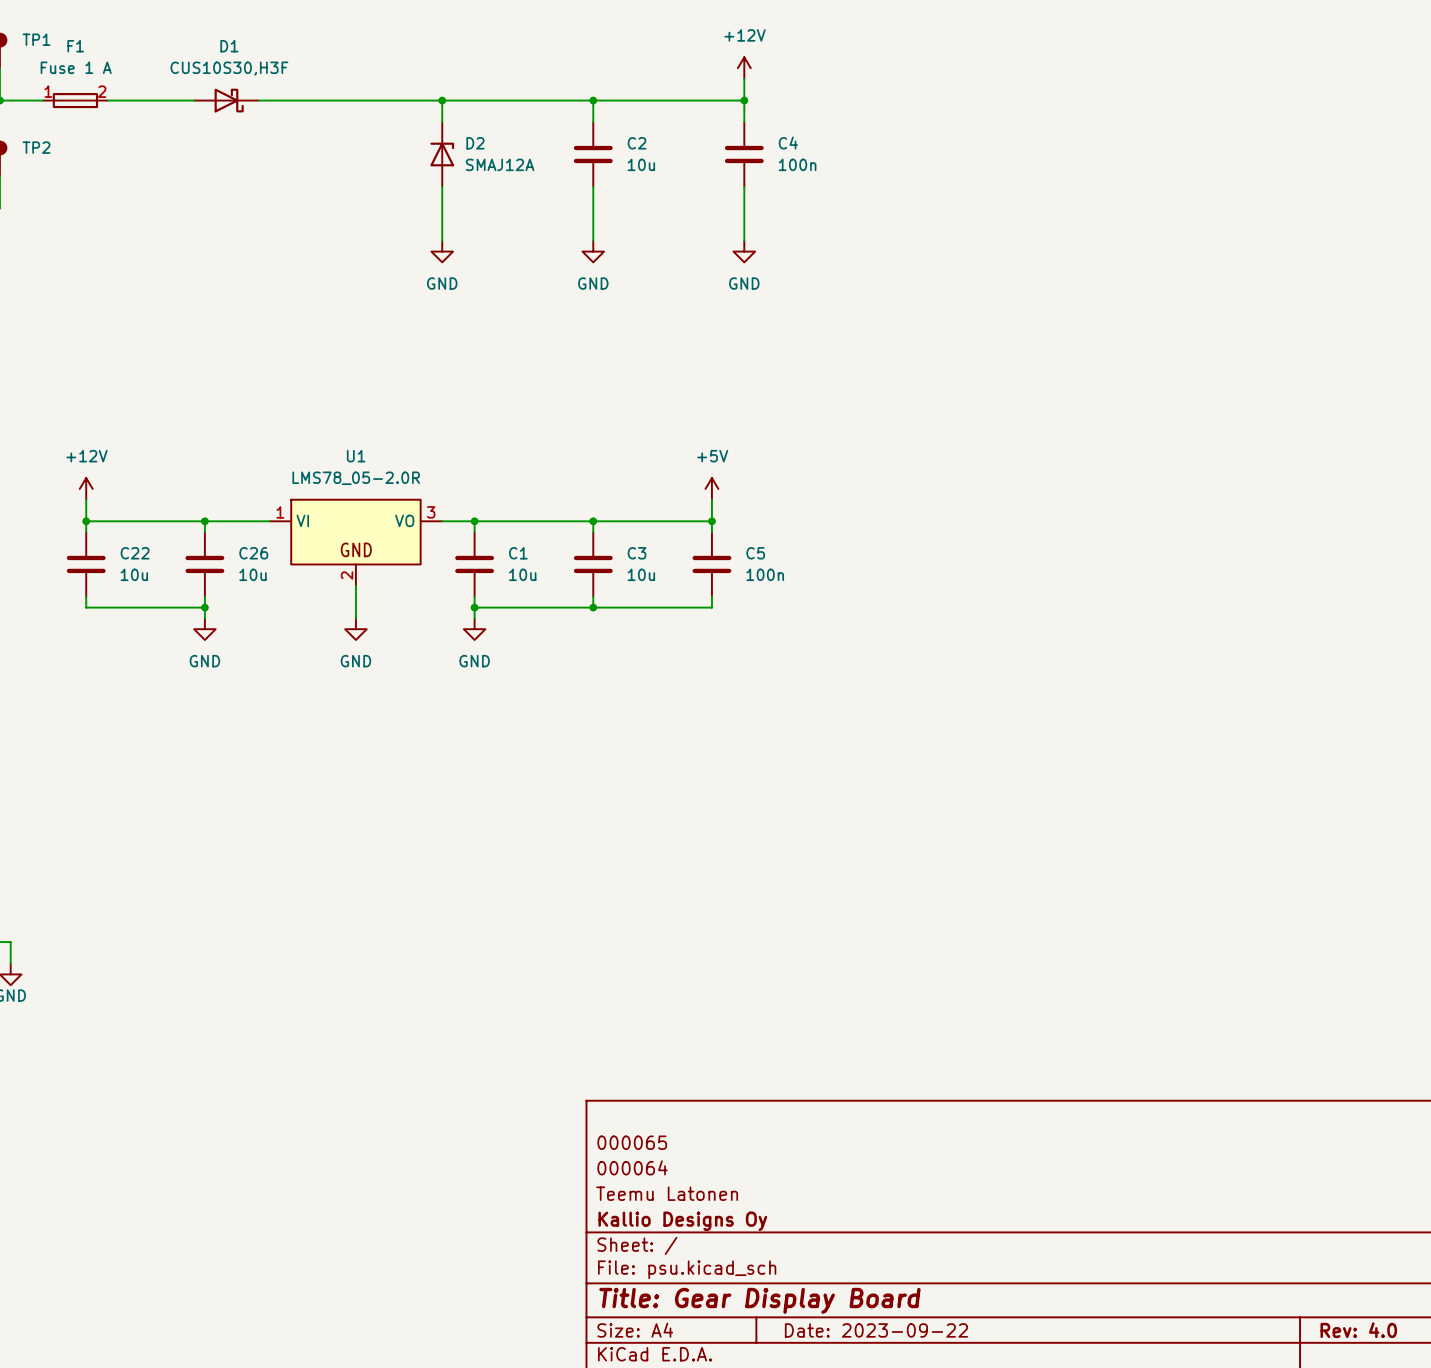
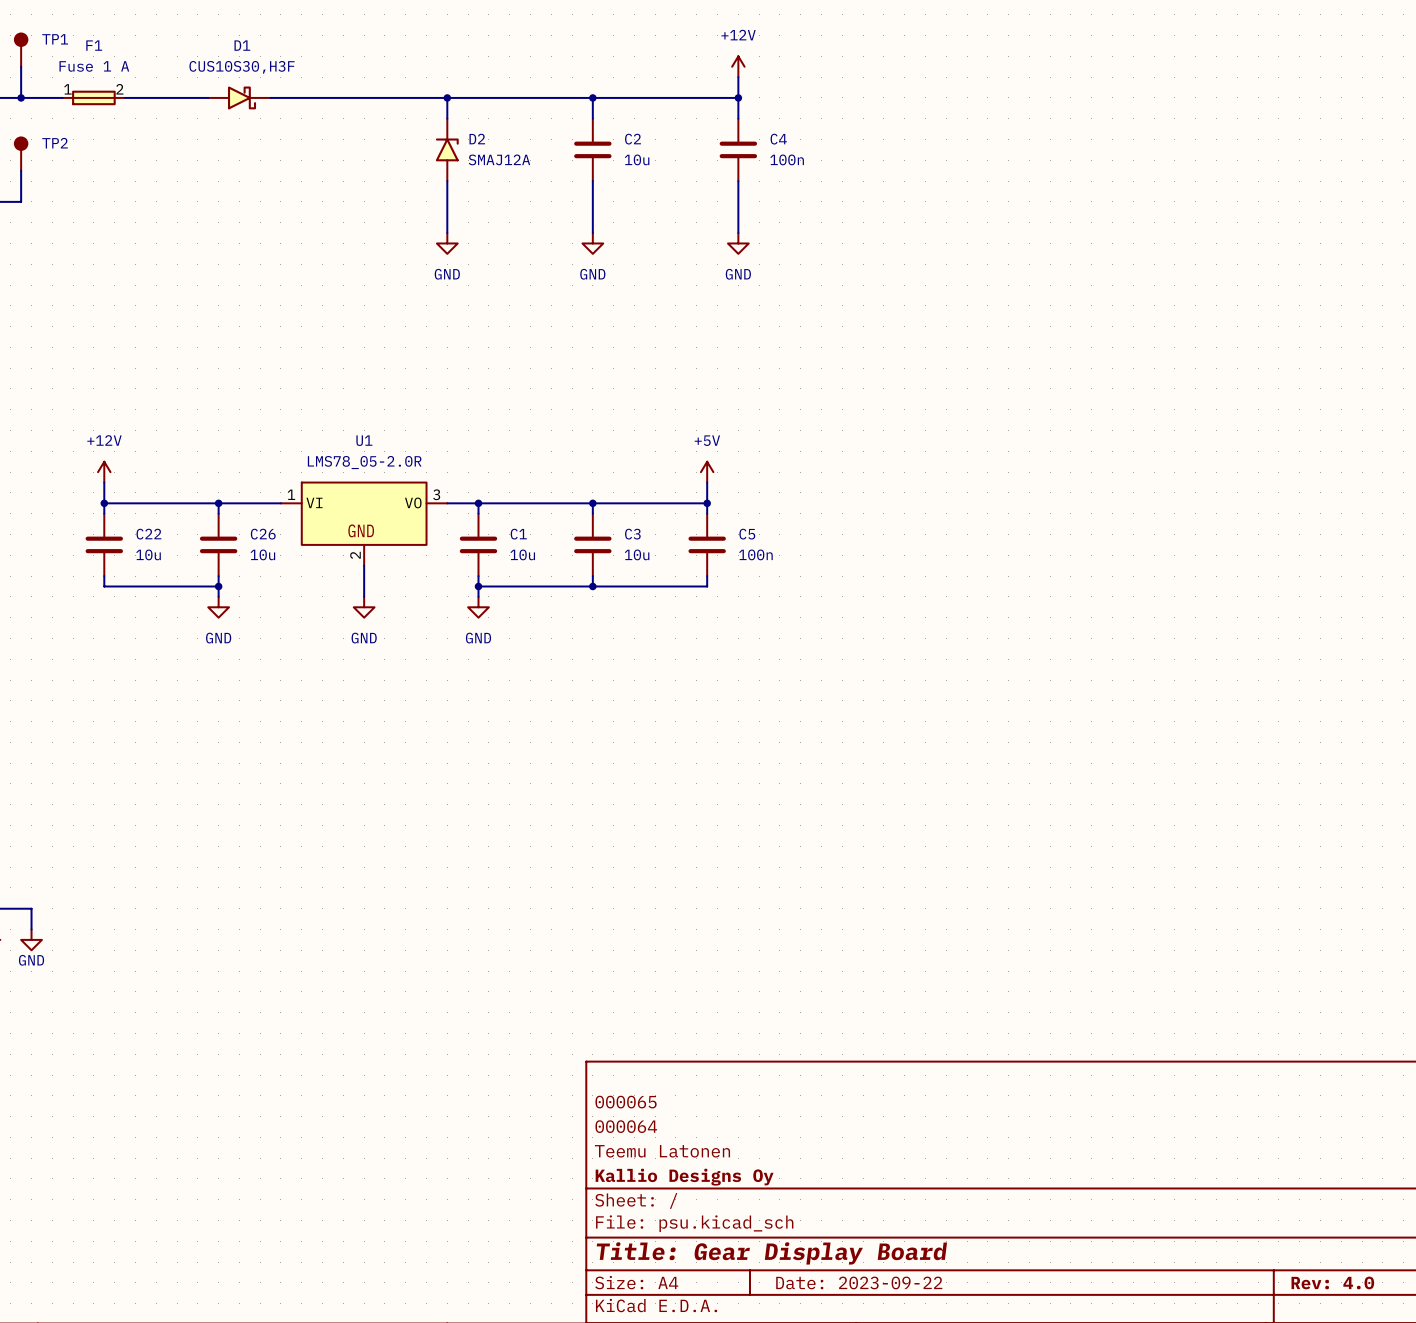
D1 symbol: [194, 88, 259, 113] -> [208, 86, 271, 110]
F1 symbol: [43, 93, 108, 109] -> [62, 90, 126, 106]
D2 symbol: [430, 122, 455, 187] -> [435, 118, 459, 182]

